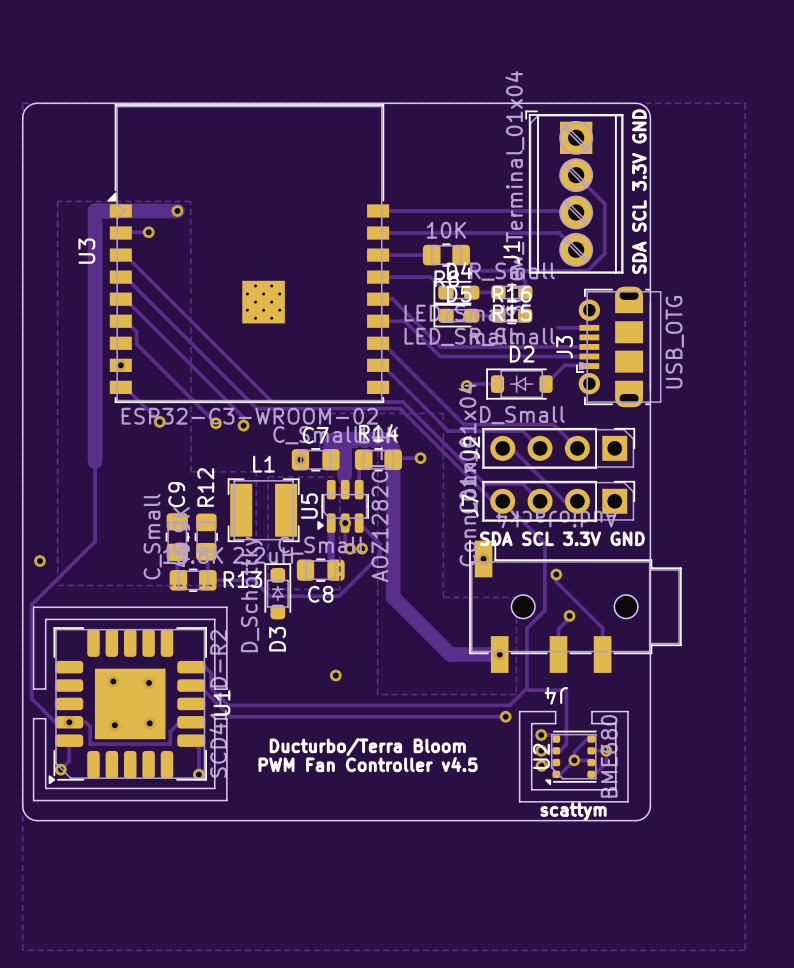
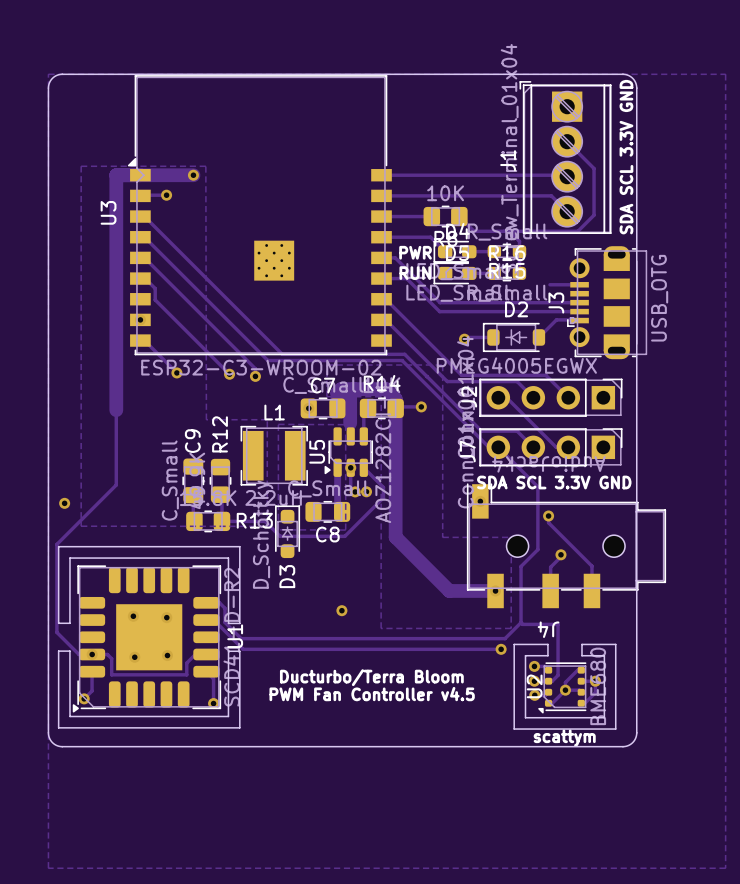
J1 name position: J1 (511, 252) -> J1 (508, 160)
text: none -> PWR (415, 252)
text: none -> RUN (415, 273)
D2 value: D_Small (522, 415) -> PMEG4005EGWX (516, 365)

